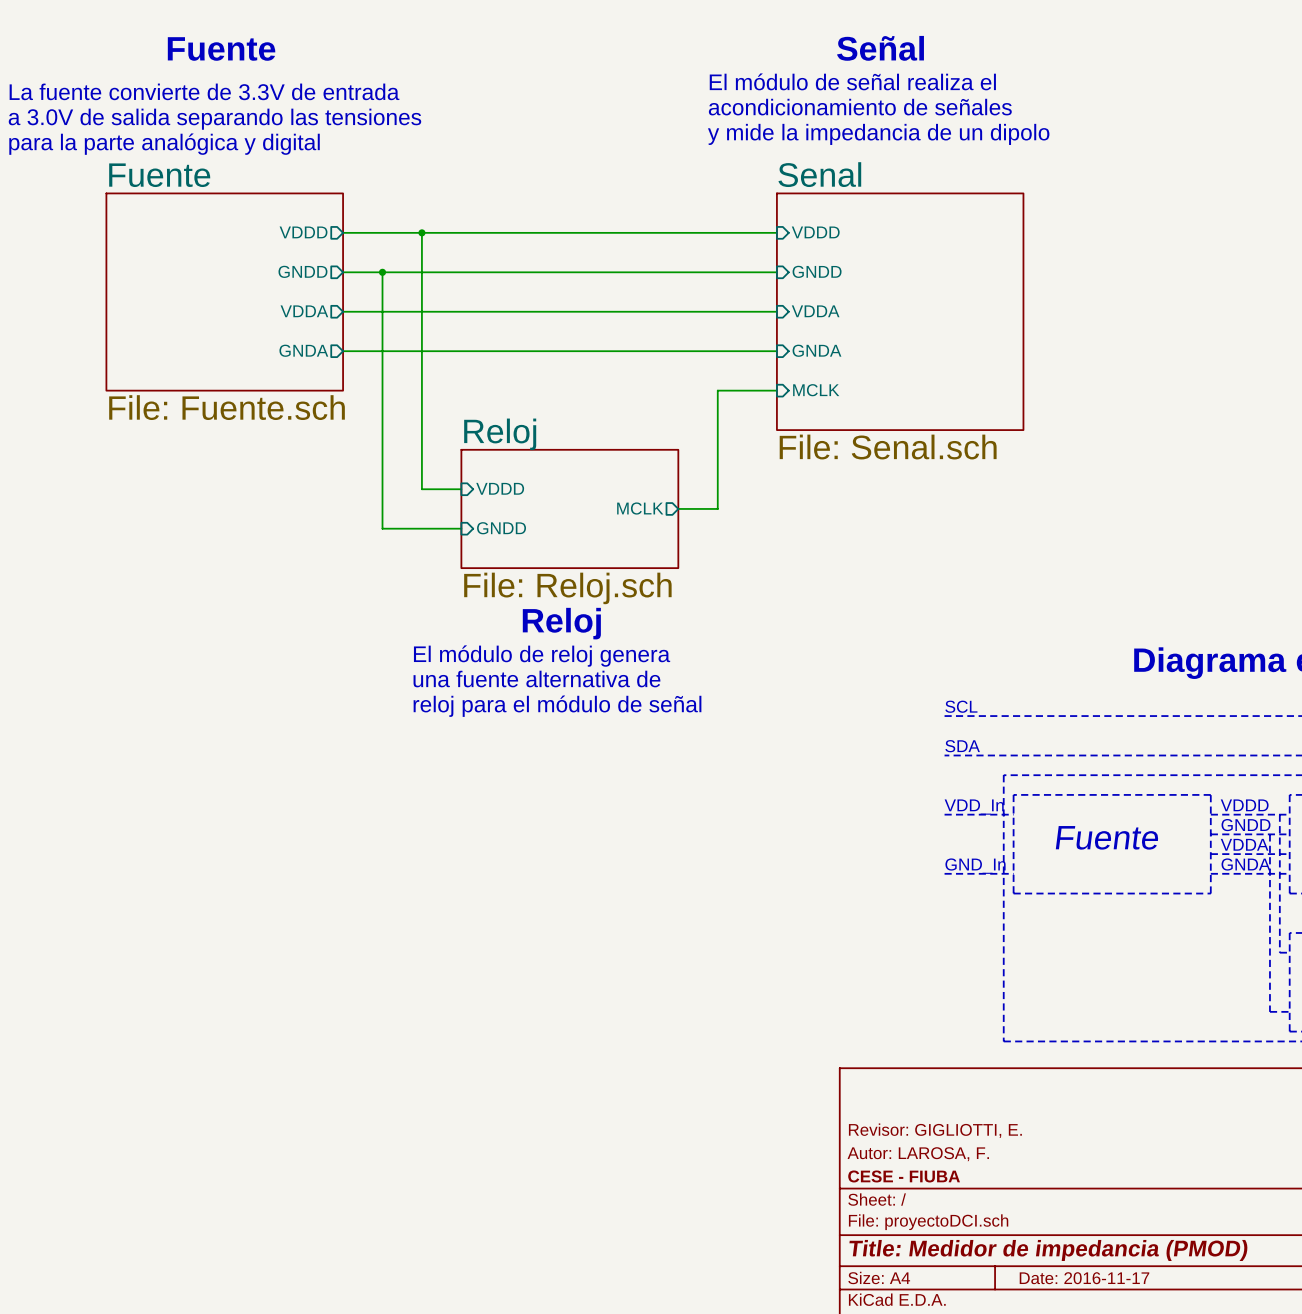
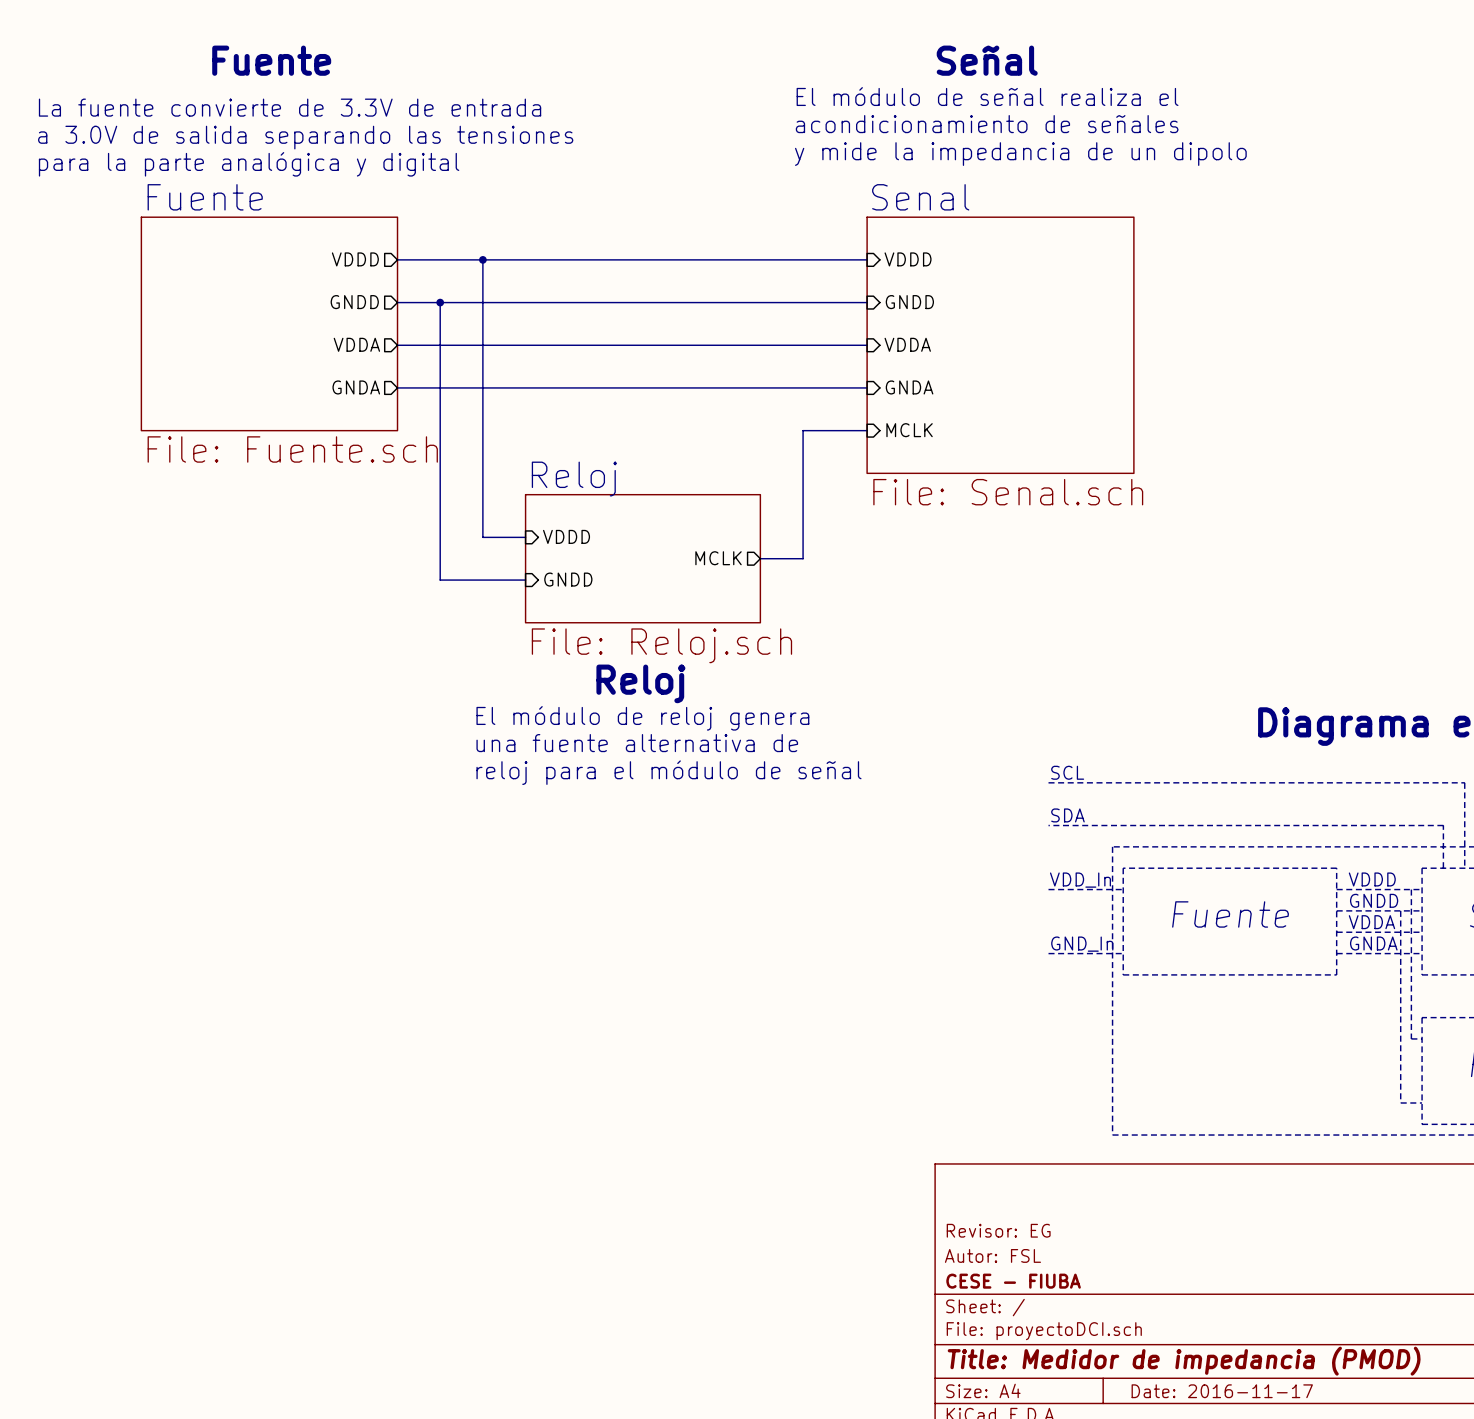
title block: Revisor: GIGLIOTTI, E. (935, 1130) -> Revisor: EG (998, 1230)
title block: Autor: LAROSA, F. (918, 1154) -> Autor: FSL (992, 1255)

